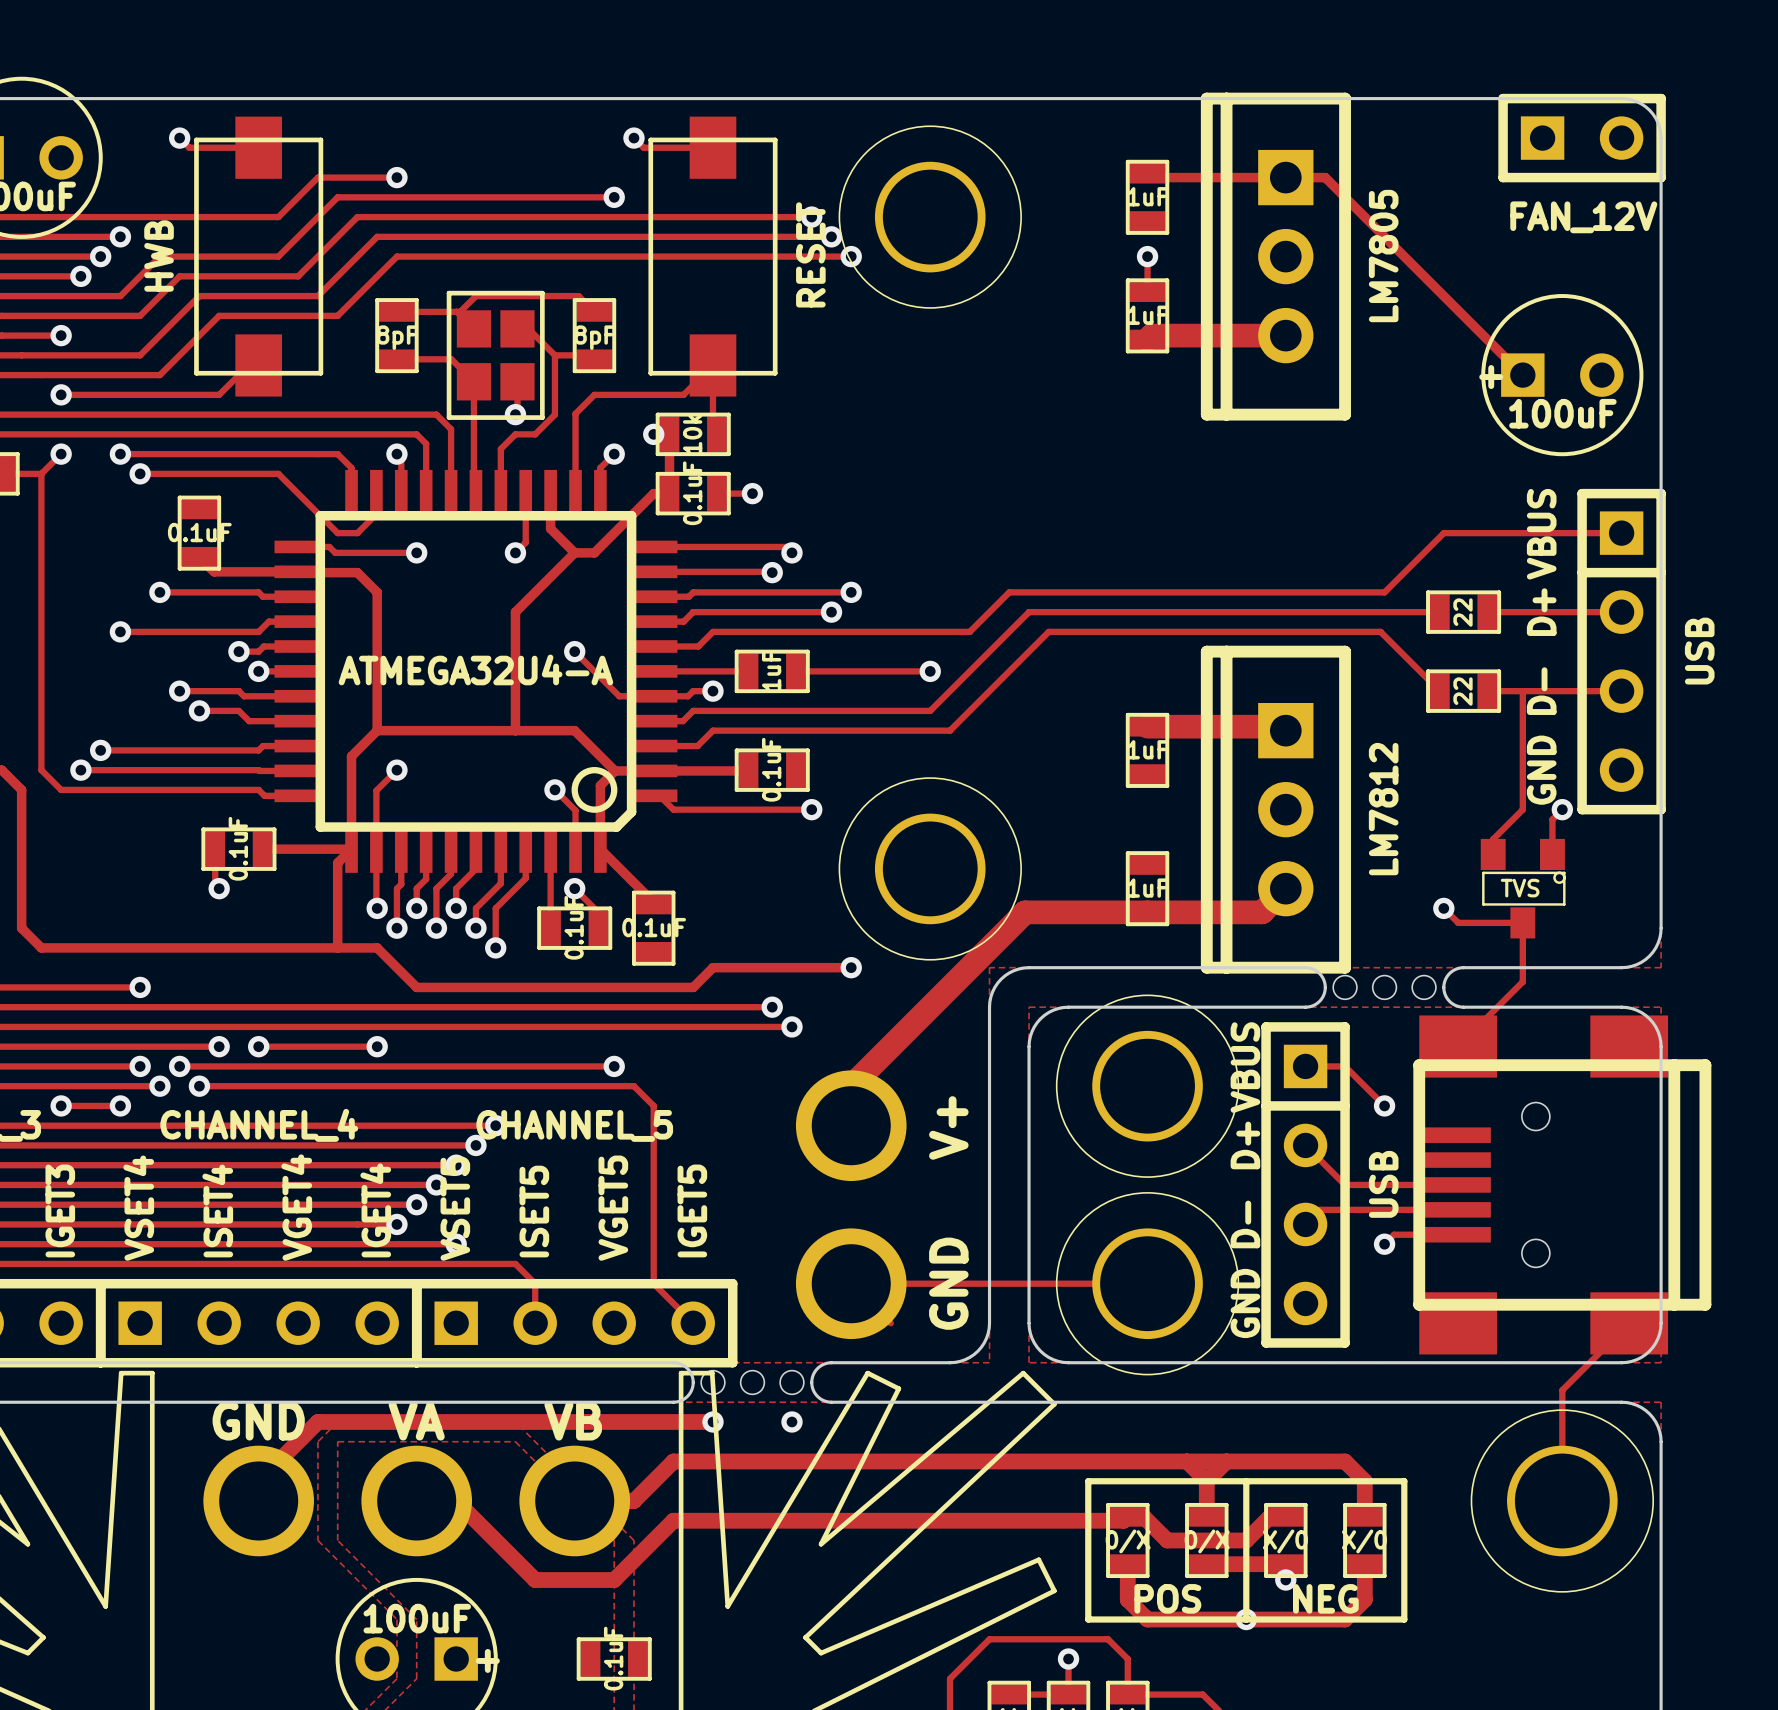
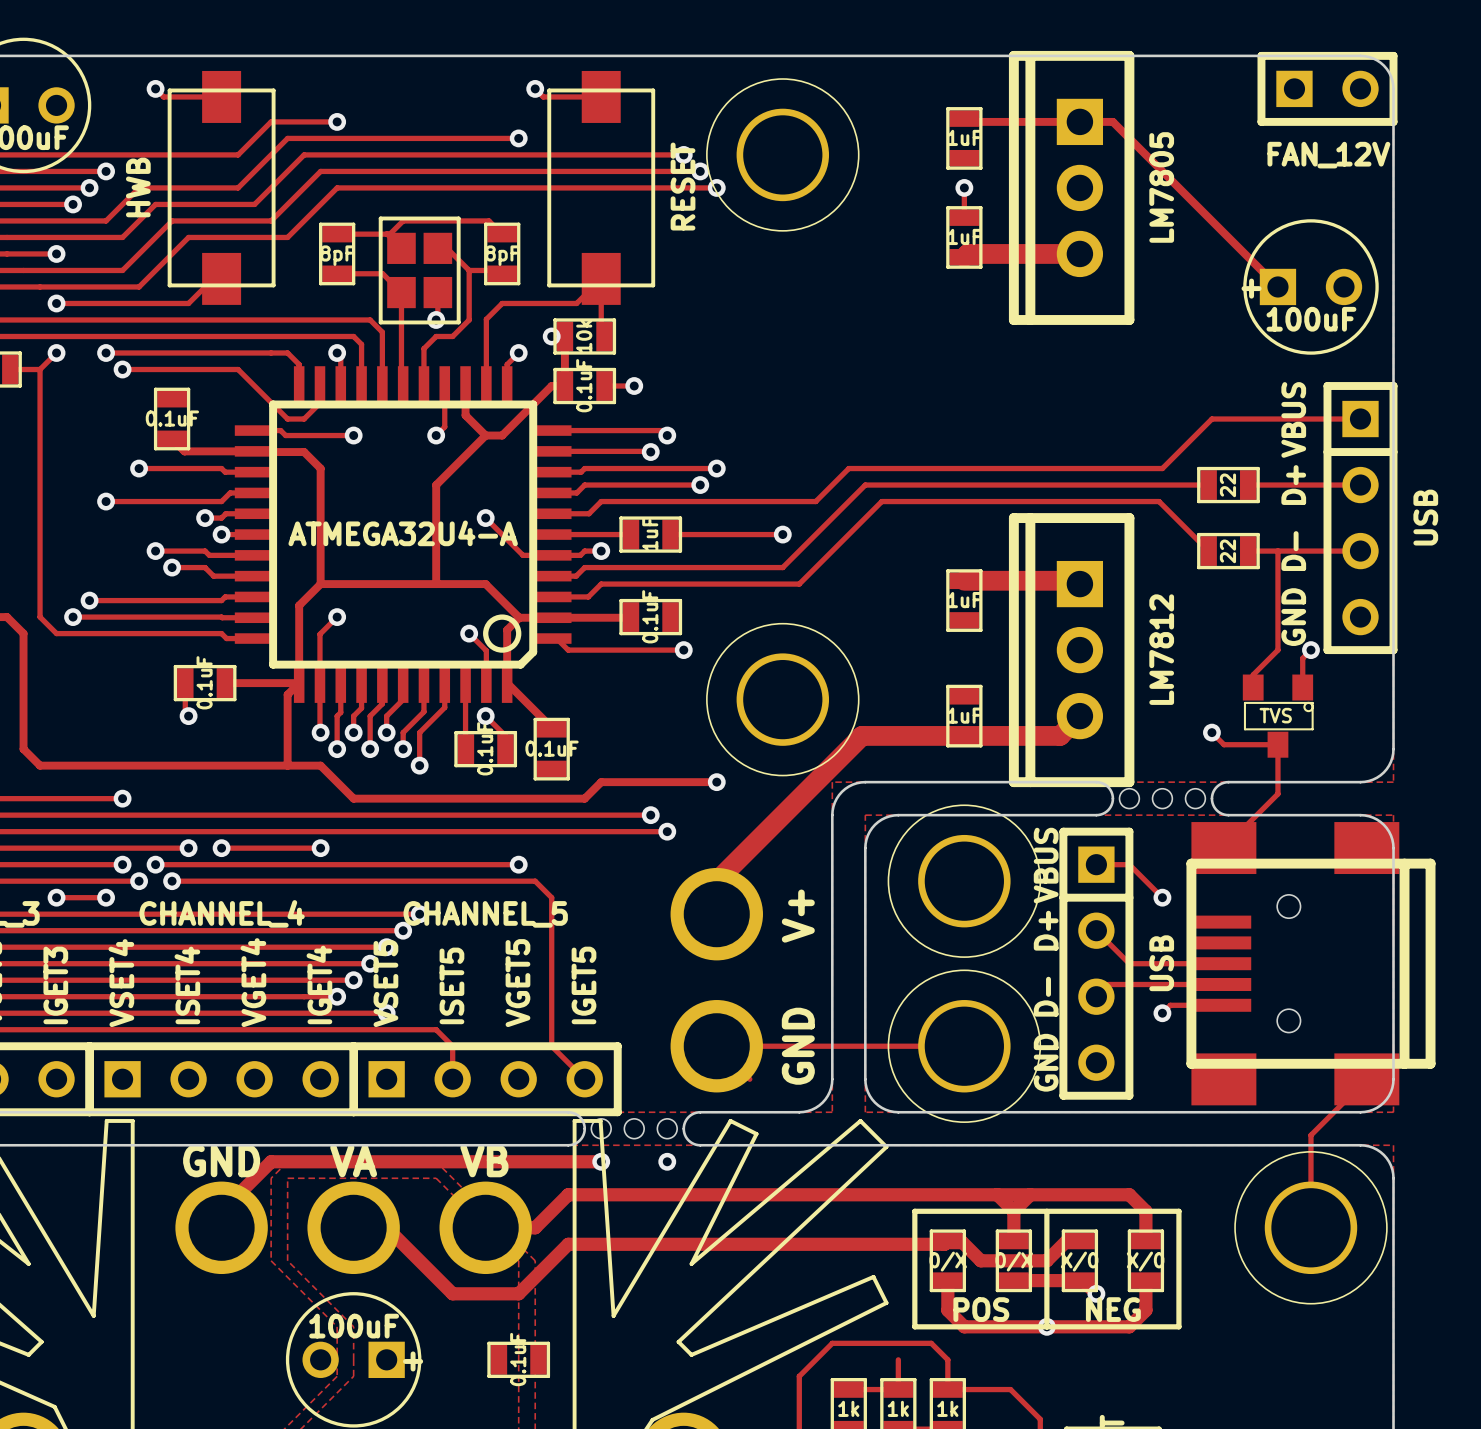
via position: (1285, 1580) -> (1096, 1293)
via: (1068, 1659) -> none

